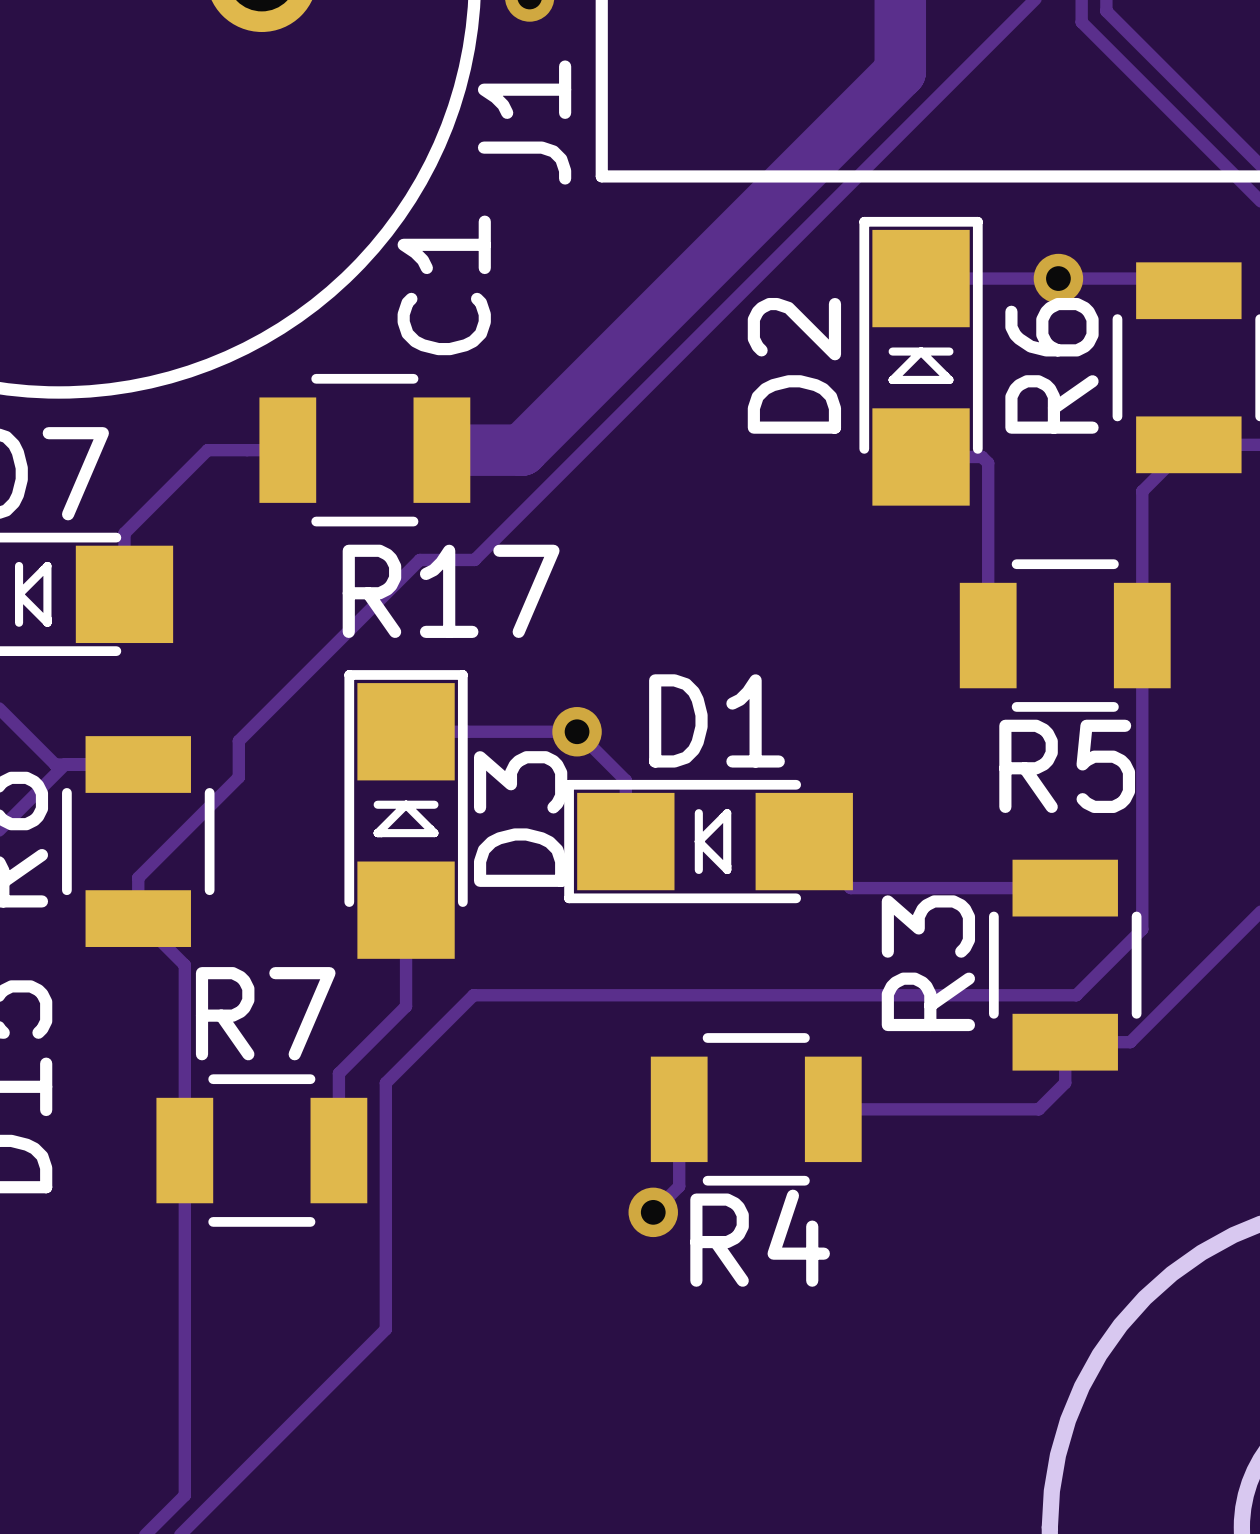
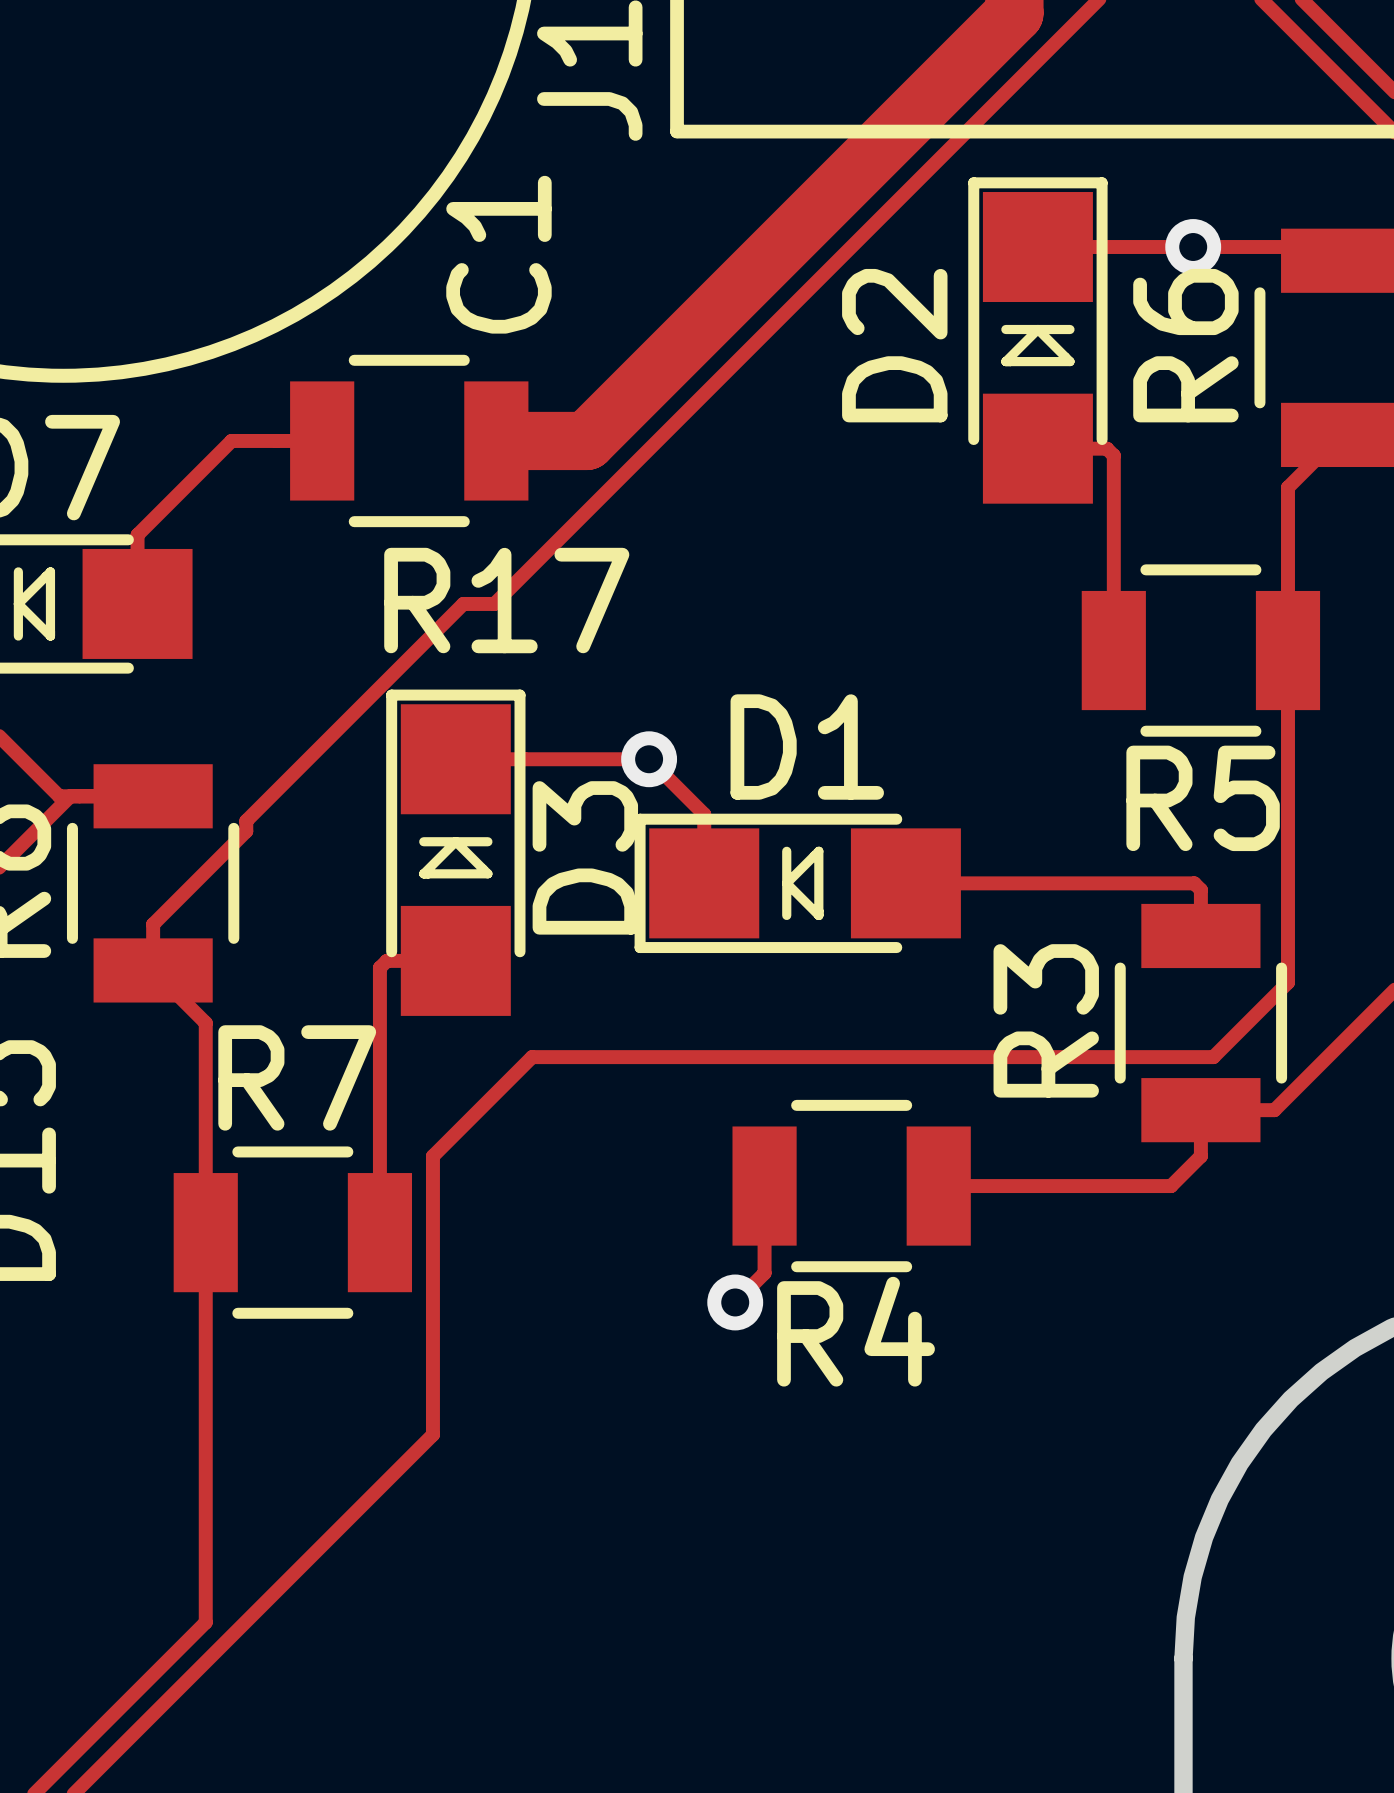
track: (474, 559) (419, 559) (238, 741) (238, 777) (220, 795) -> (533, 565) (494, 603) (463, 603) (246, 821) (246, 831)
track: (804, 841) (850, 888) (1065, 888) -> (905, 883) (1194, 883) (1200, 889) (1200, 935)
track: (406, 910) (406, 1006) (338, 1073) -> (455, 960) (386, 960) (379, 967) (379, 1145)

